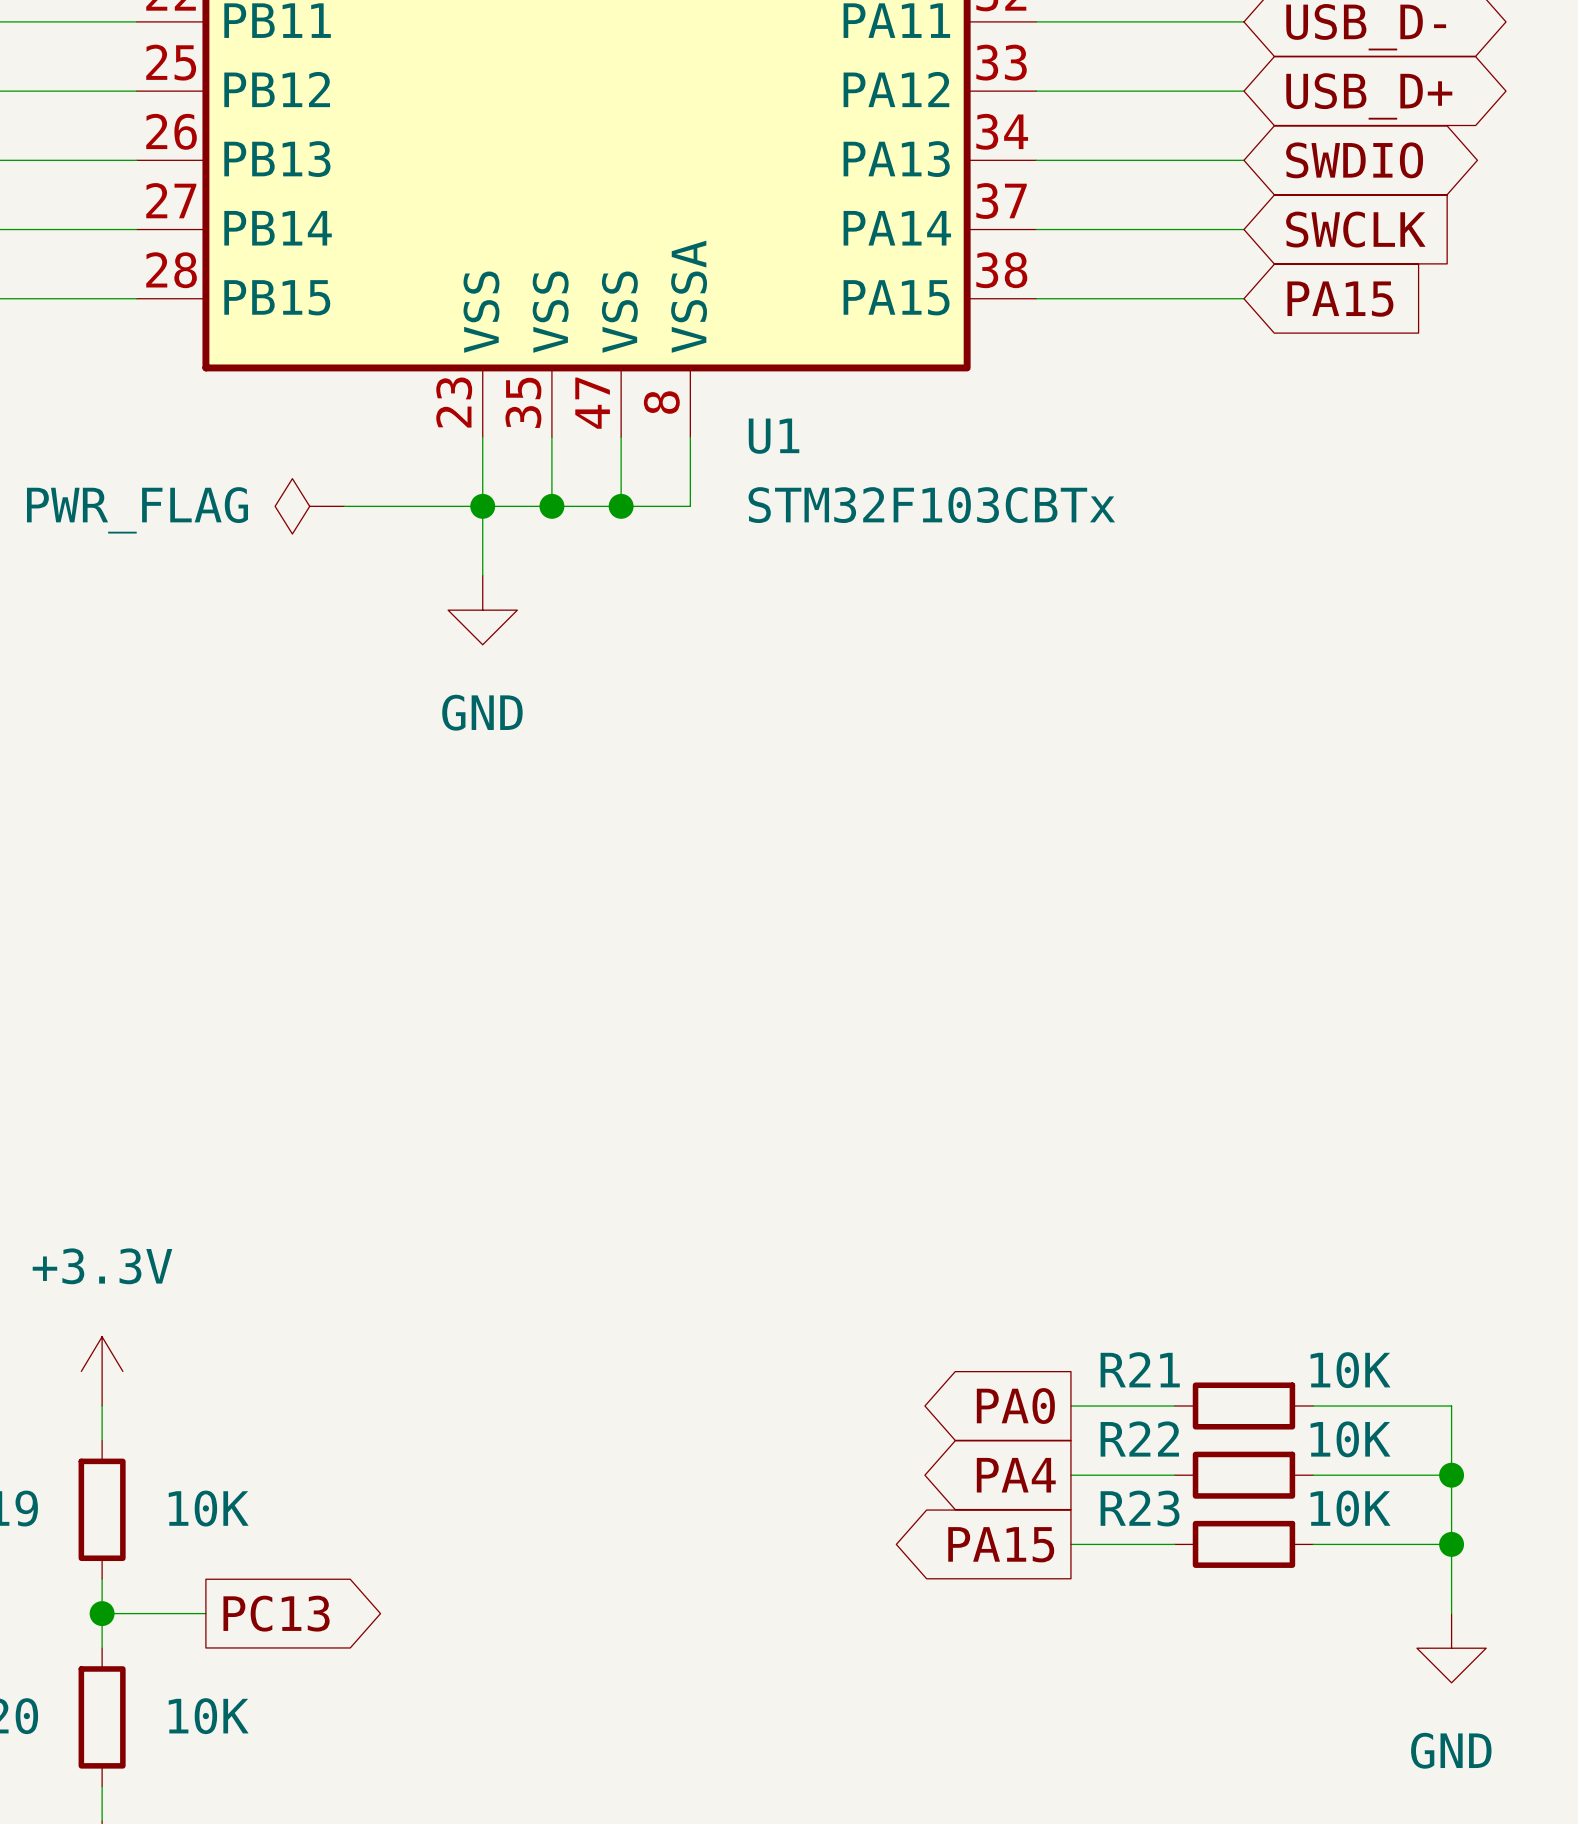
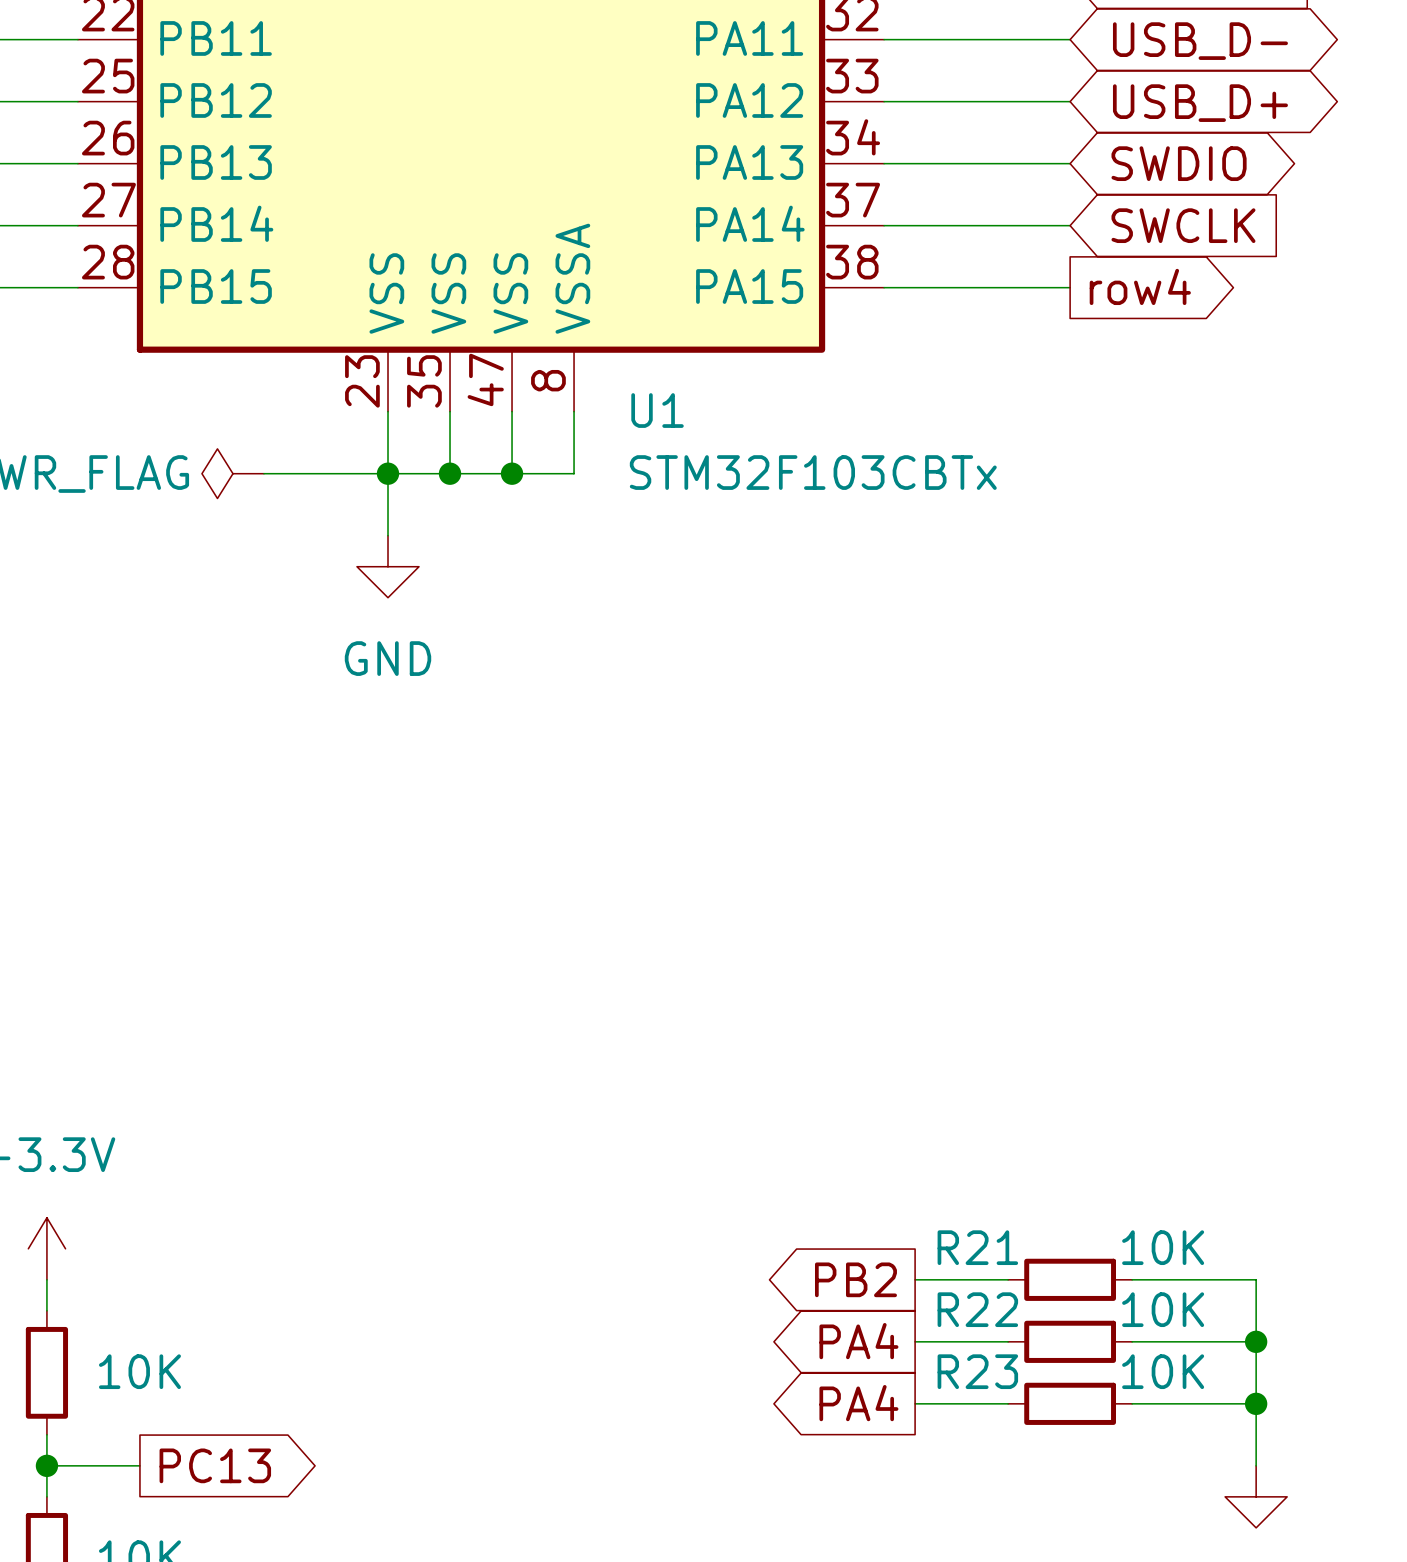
global label shape: input (1340, 299) -> output (1140, 286)
global label: PA15 (1340, 299) -> row4 (1140, 286)
global label: PA0 (1015, 1406) -> PB2 (855, 1279)
global label: PA15 (1001, 1544) -> PA4 (858, 1403)

